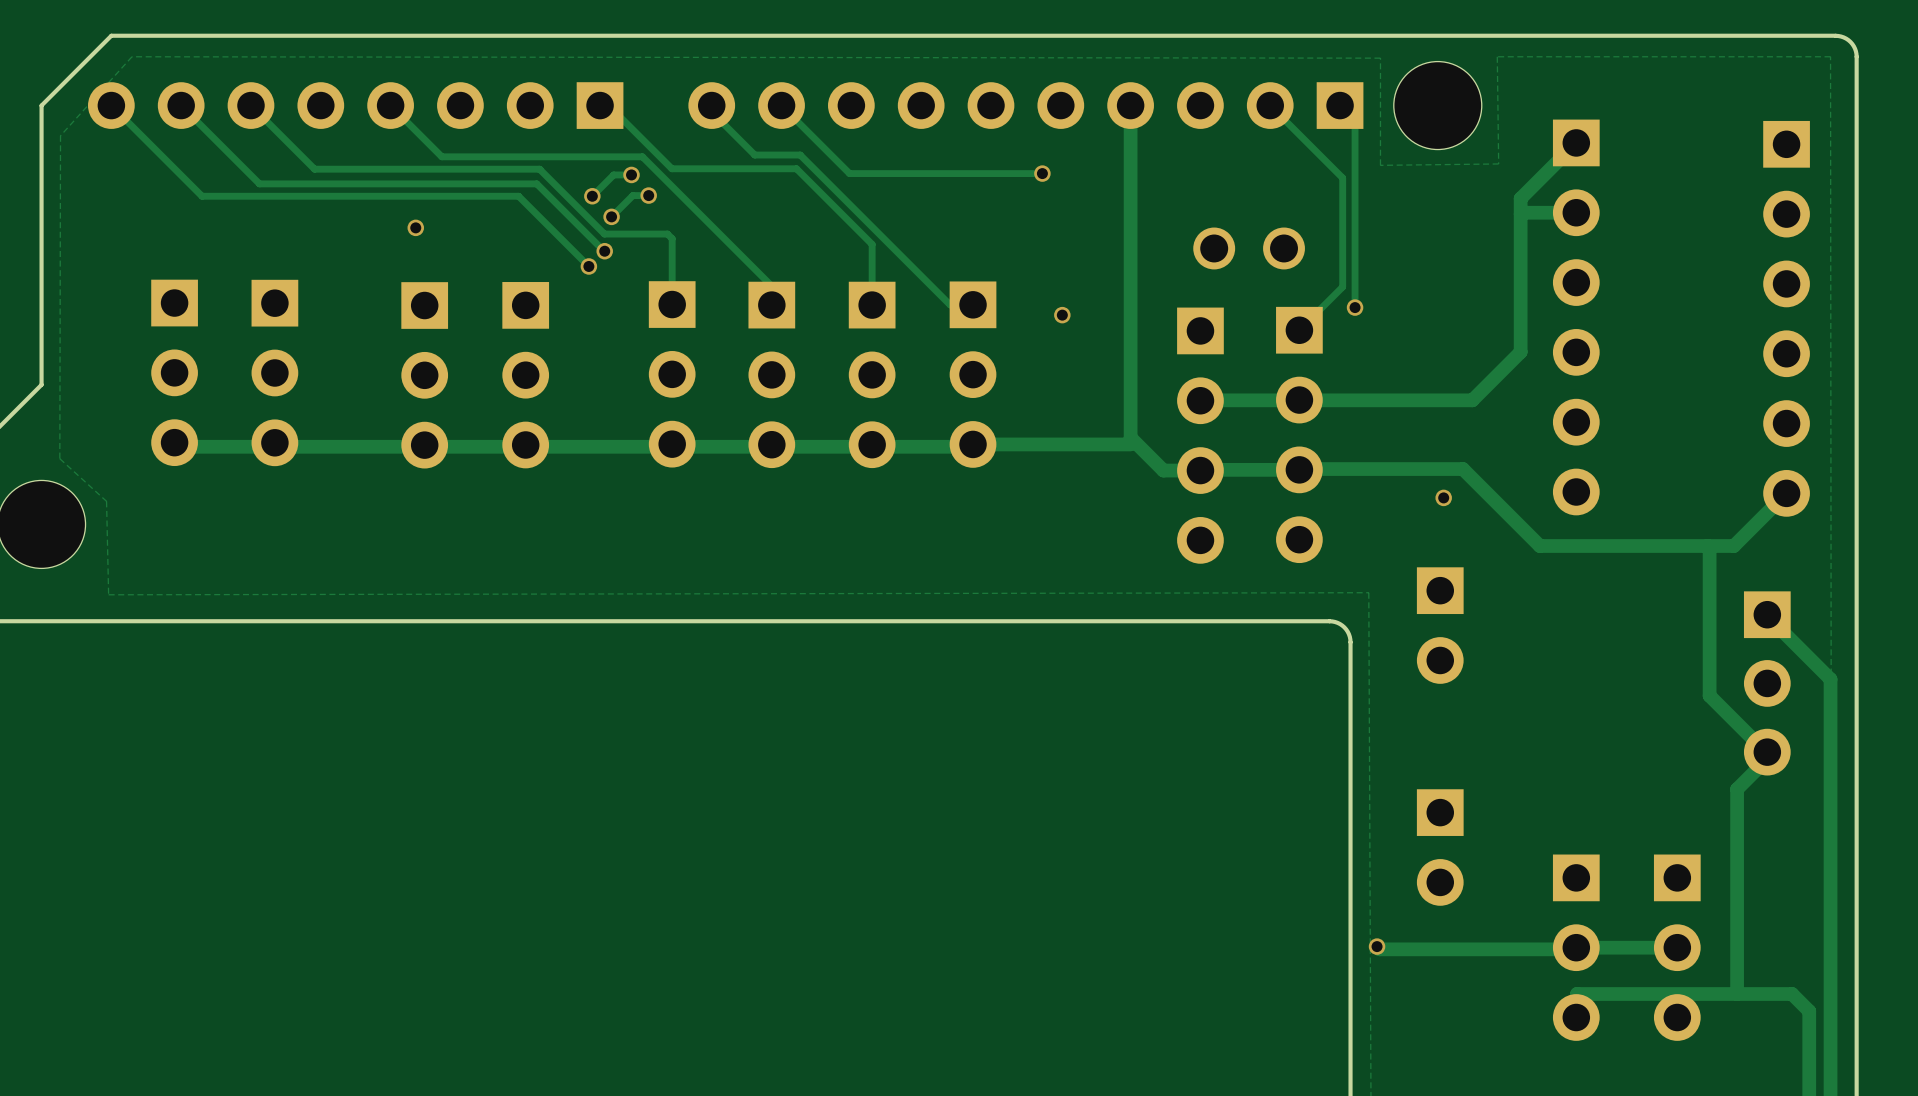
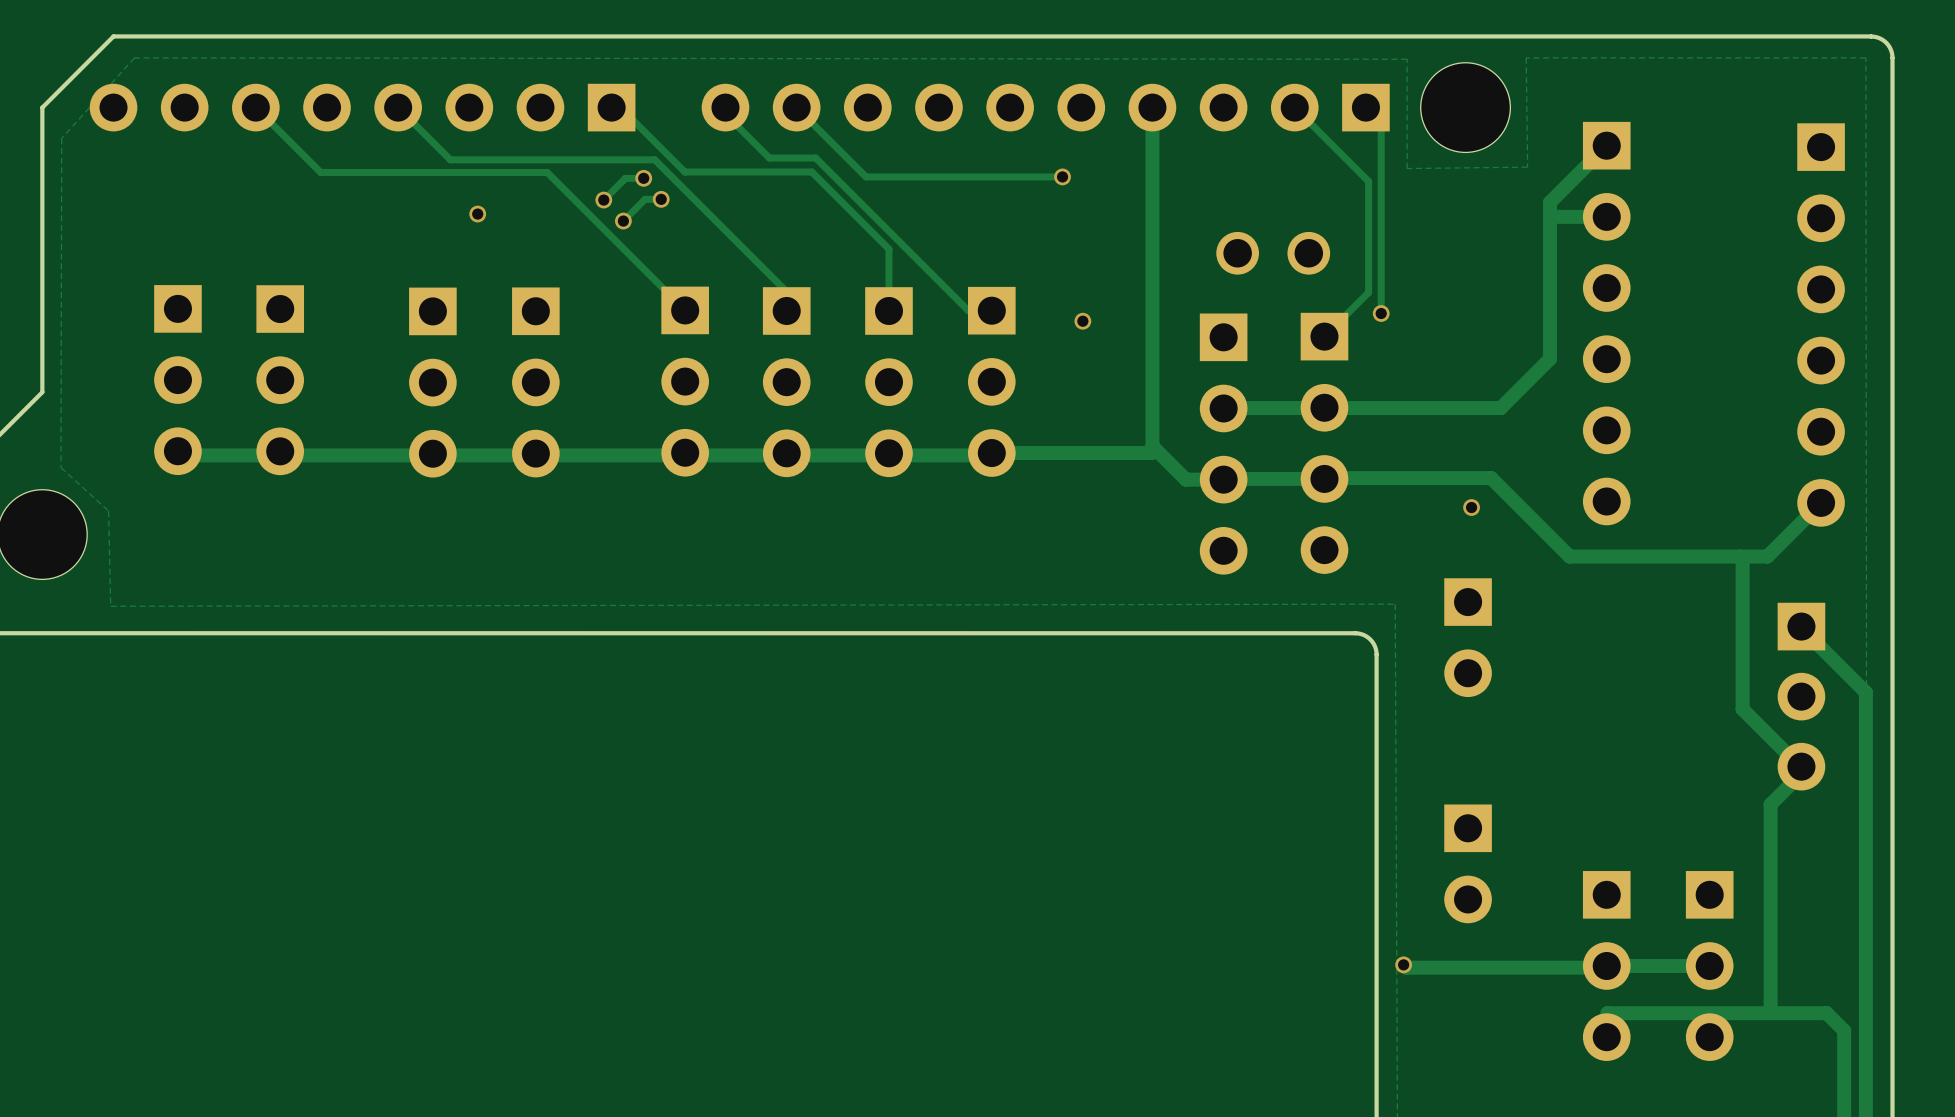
track: (111, 105) (202, 196) (518, 196) (588, 266) -> none
track: (181, 105) (259, 183) (536, 183) (604, 251) -> none
track: (536, 169) (539, 169) (604, 234) (667, 234) (672, 238) (672, 304) -> (547, 172) (685, 310)
via position: (415, 227) -> (477, 214)
via: (604, 251) -> none
via: (588, 266) -> none

